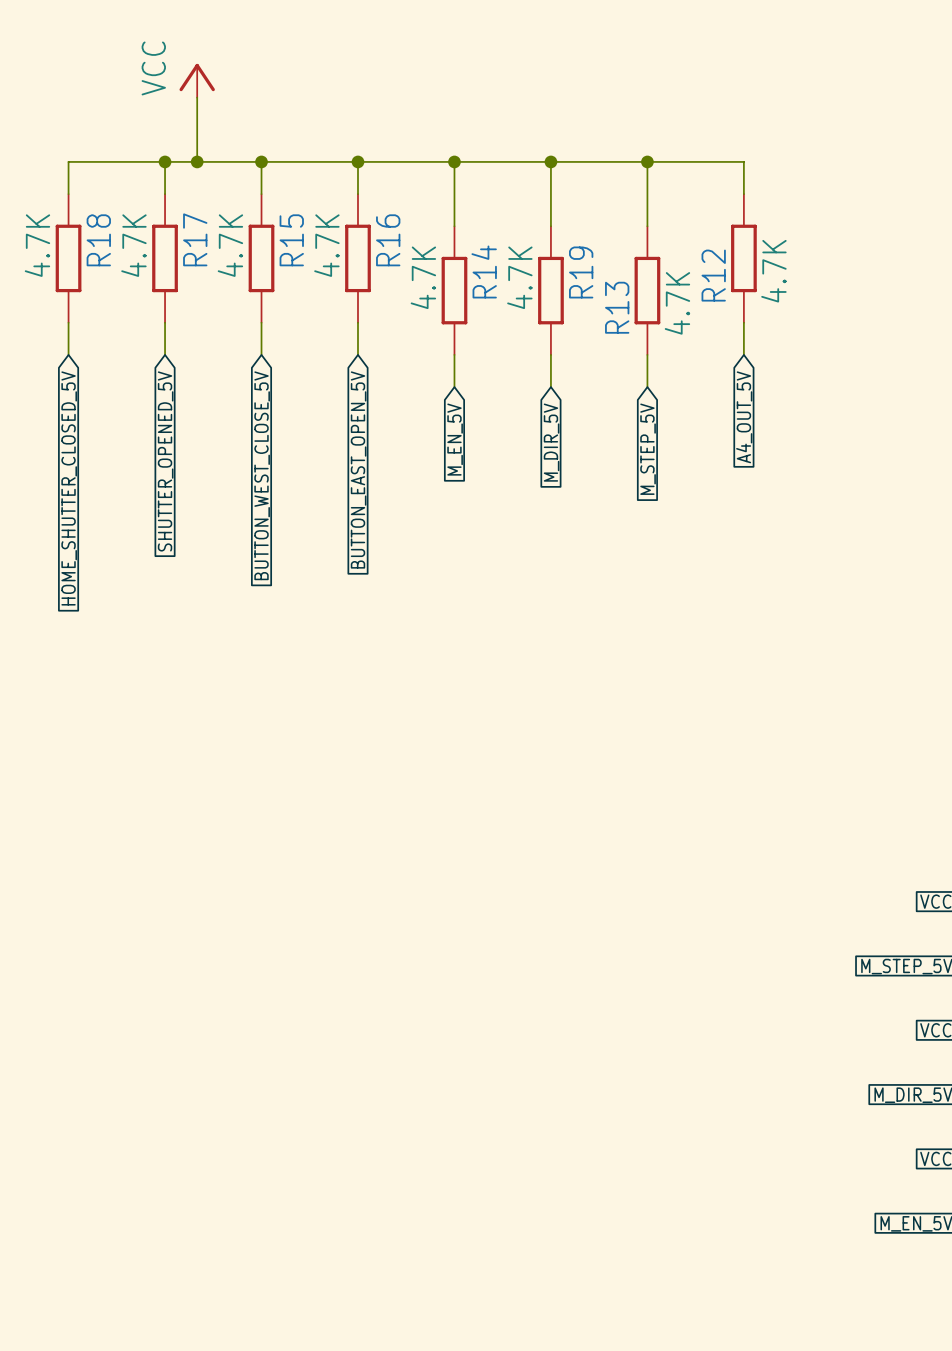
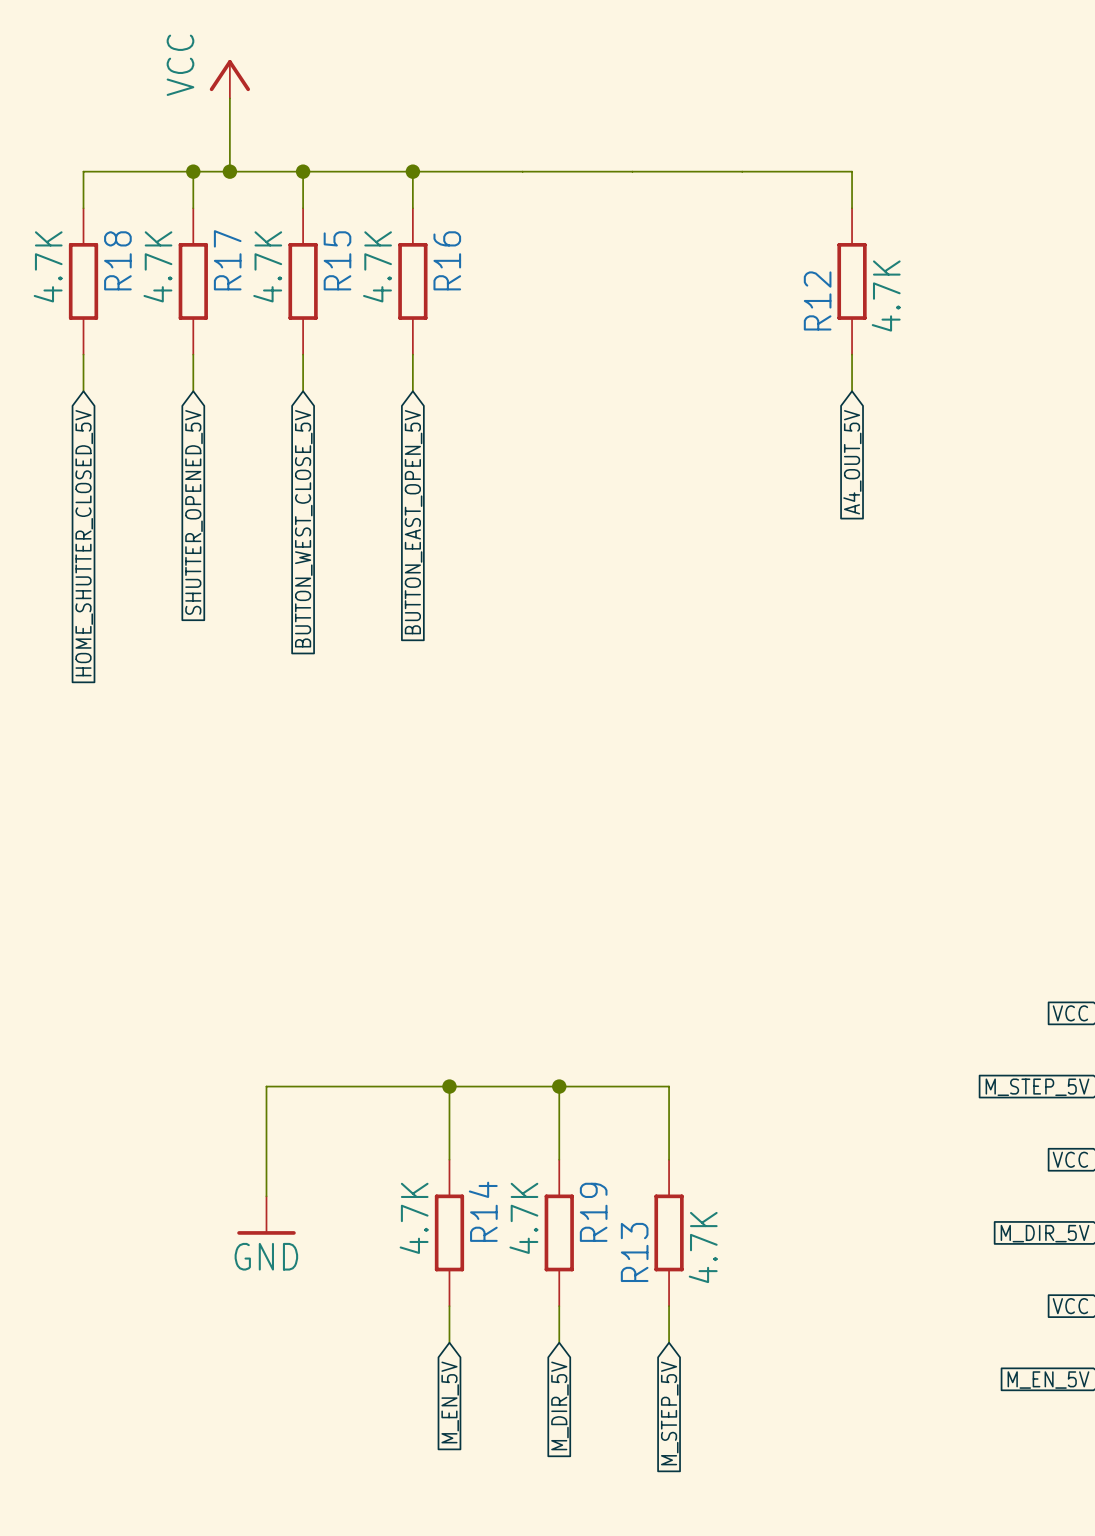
wire: (454, 161) (454, 226) -> none
junction: (454, 161) -> none
wire: (550, 161) (550, 226) -> none
junction: (550, 161) -> none
wire: (647, 161) (647, 226) -> none
junction: (647, 161) -> none
R14 position: (454, 290) -> (449, 1232)
R19 position: (550, 290) -> (559, 1232)
R13 position: (647, 290) -> (669, 1232)
wire: (454, 354) (454, 387) -> none
wire: (550, 354) (550, 387) -> none
wire: (647, 354) (647, 387) -> none
global label: M_EN_5V (455, 439) -> none
global label: M_DIR_5V (551, 442) -> none
global label: M_STEP_5V (648, 449) -> none
wire: none -> (449, 1086) (449, 1159)
junction: none -> (449, 1086)
wire: none -> (559, 1086) (559, 1159)
junction: none -> (559, 1086)
wire: none -> (669, 1159) (669, 1086) (266, 1086) (266, 1196)
power symbol: none -> GND (266, 1215)
wire: none -> (449, 1306) (449, 1342)
wire: none -> (559, 1306) (559, 1342)
wire: none -> (669, 1306) (669, 1342)
global label: none -> M_EN_5V (450, 1402)
global label: none -> M_DIR_5V (559, 1405)
global label: none -> M_STEP_5V (669, 1413)

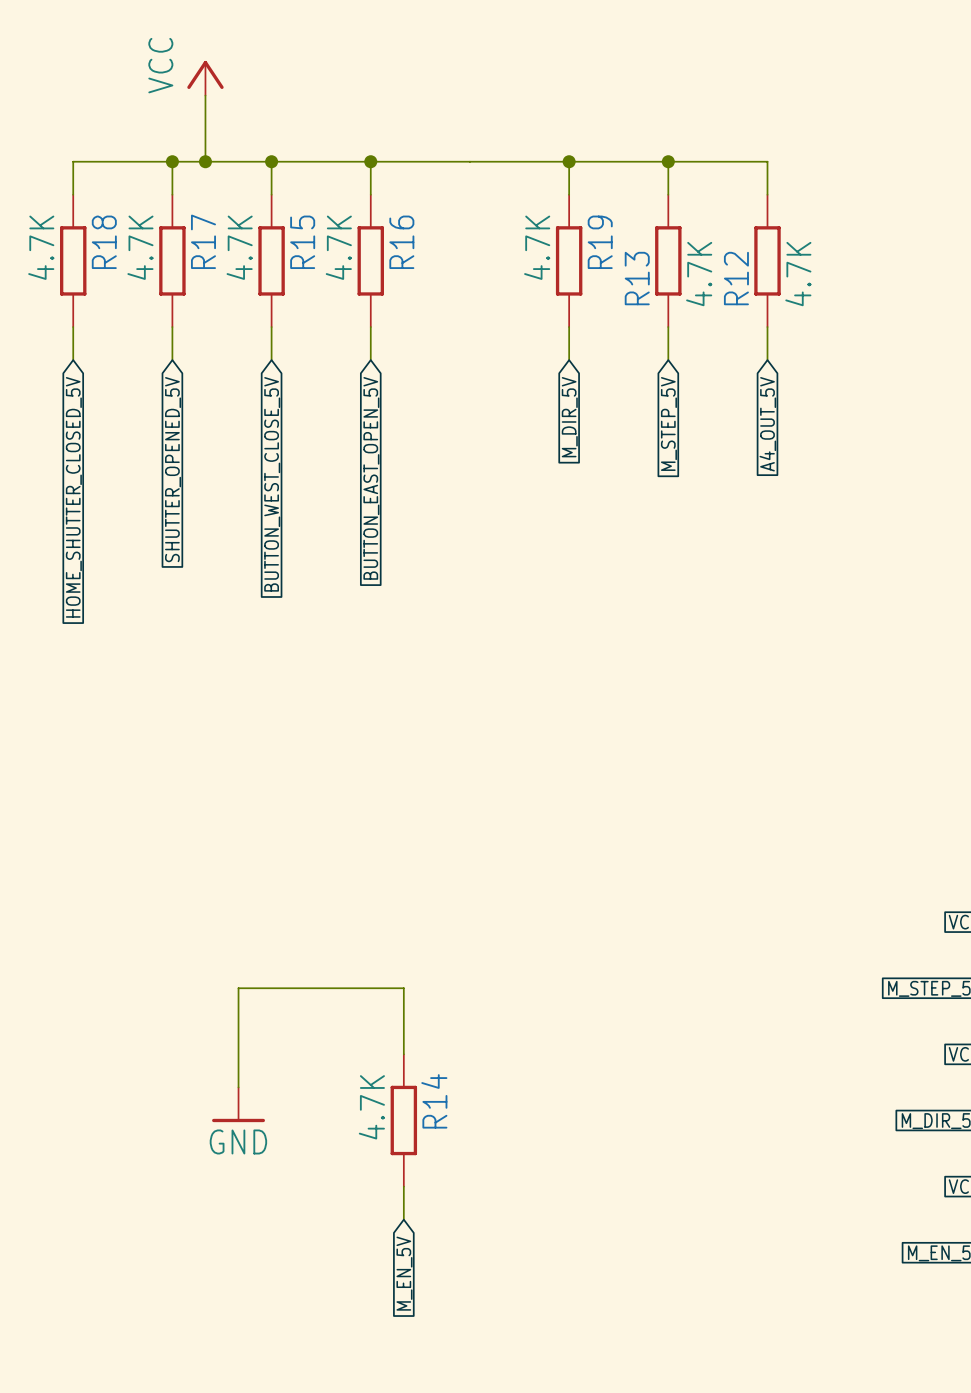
wire: none -> (569, 161) (569, 194)
junction: none -> (569, 161)
wire: none -> (668, 161) (668, 194)
junction: none -> (668, 161)
wire: none -> (569, 327) (569, 360)
wire: none -> (668, 327) (668, 360)
global label: none -> M_DIR_5V (569, 417)
global label: none -> M_STEP_5V (668, 423)
wire: (449, 1086) (669, 1086) (669, 1159) -> none
junction: (449, 1086) -> none
wire: (559, 1086) (559, 1159) -> none
junction: (559, 1086) -> none
R19 position: (559, 1232) -> (569, 260)
R13 position: (669, 1232) -> (668, 260)
wire: (559, 1306) (559, 1342) -> none
wire: (669, 1306) (669, 1342) -> none
global label: M_DIR_5V (559, 1405) -> none
global label: M_STEP_5V (669, 1413) -> none

